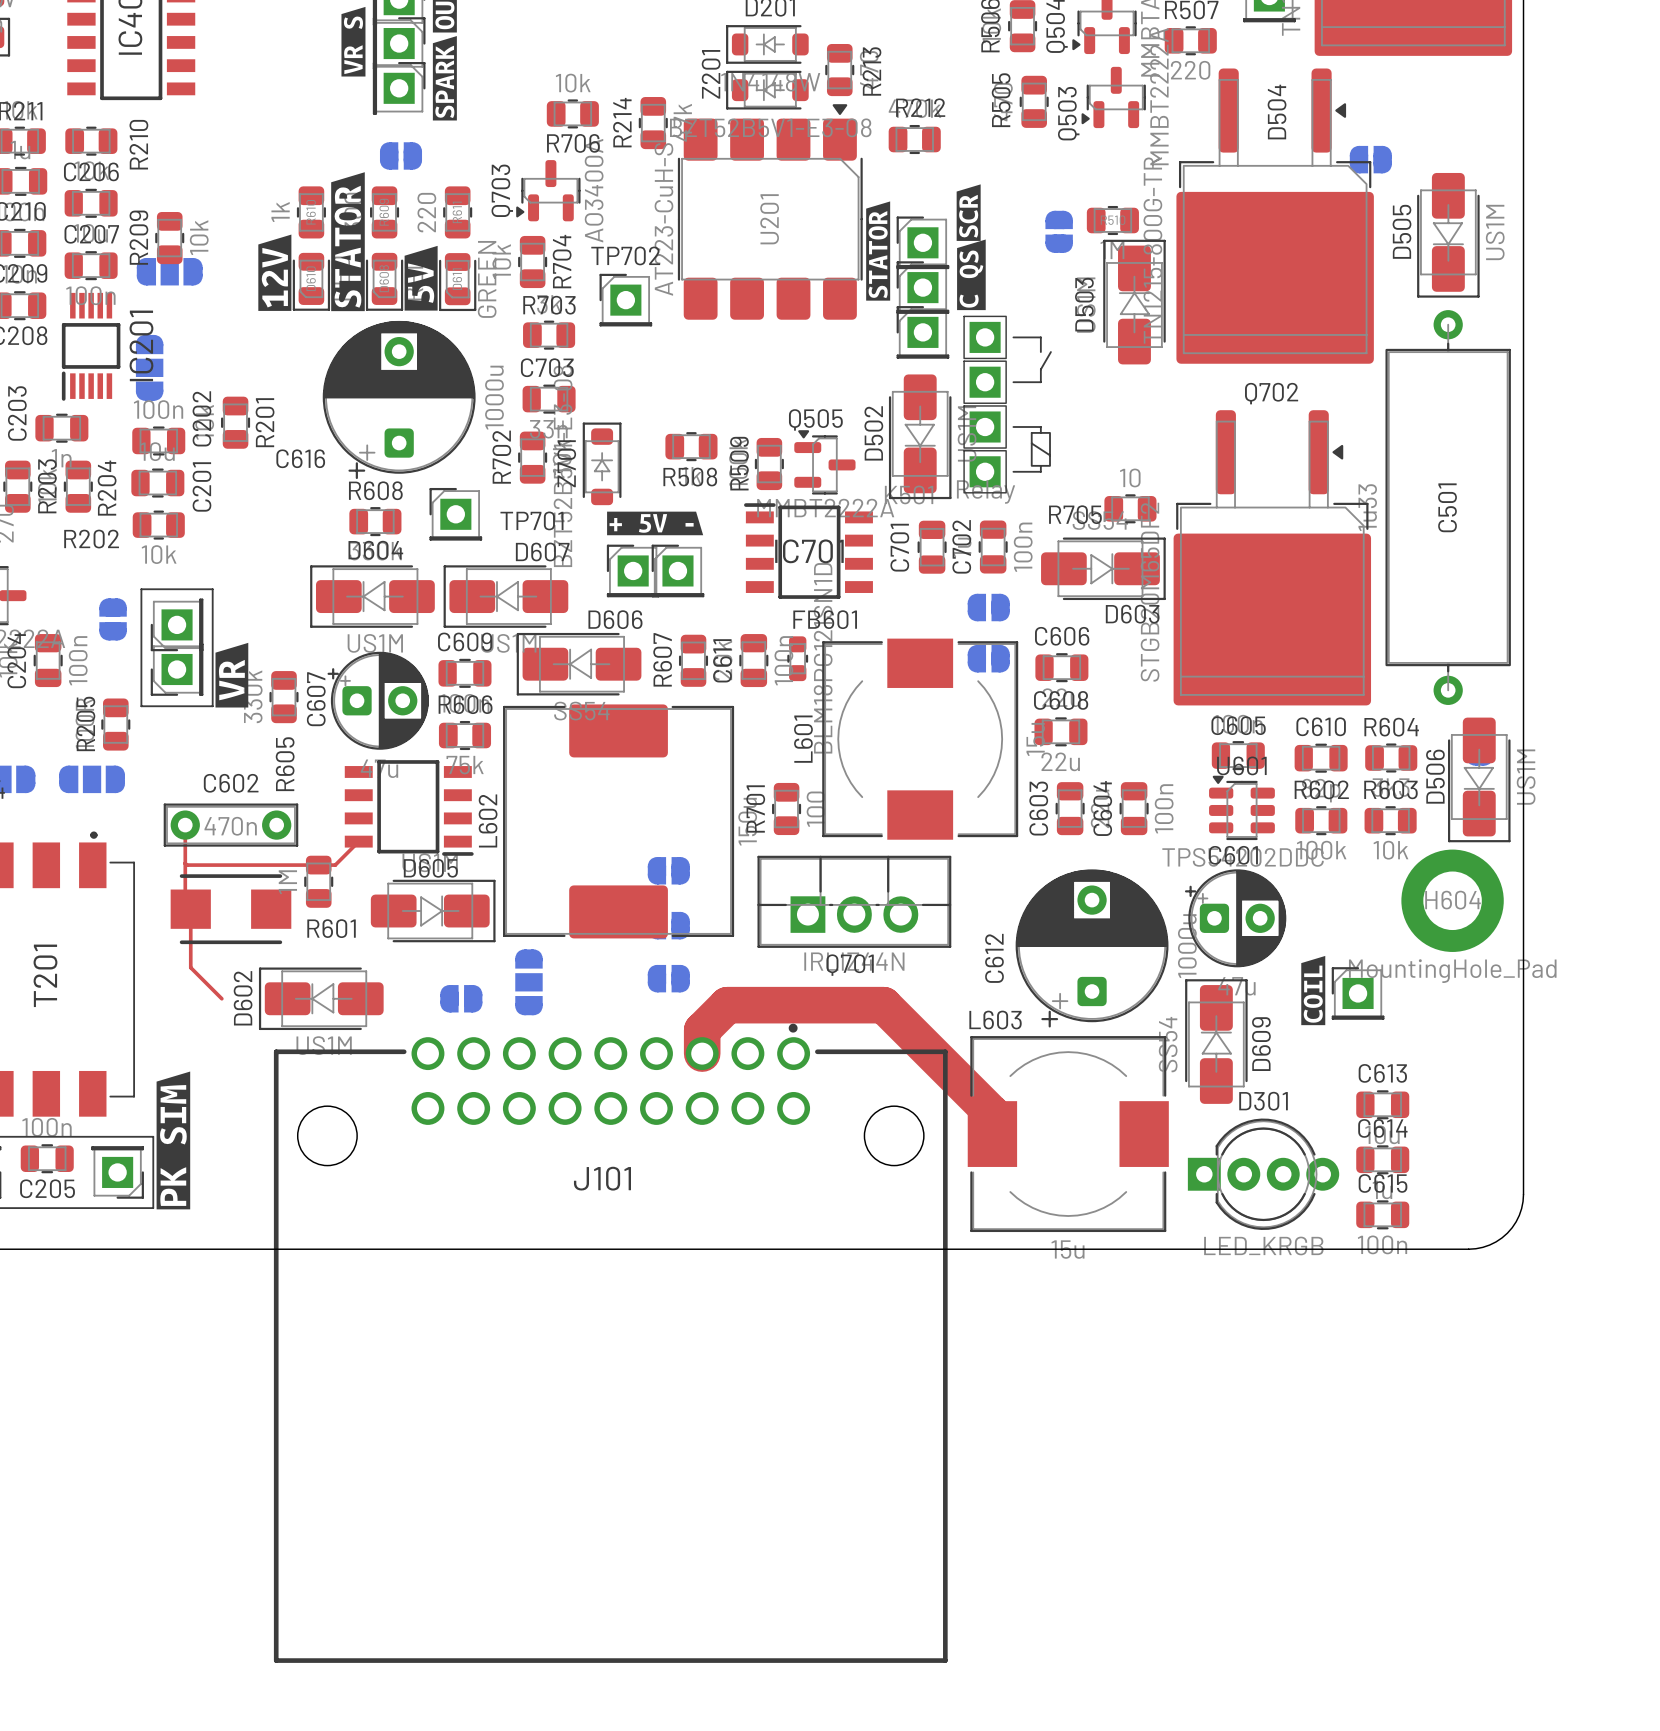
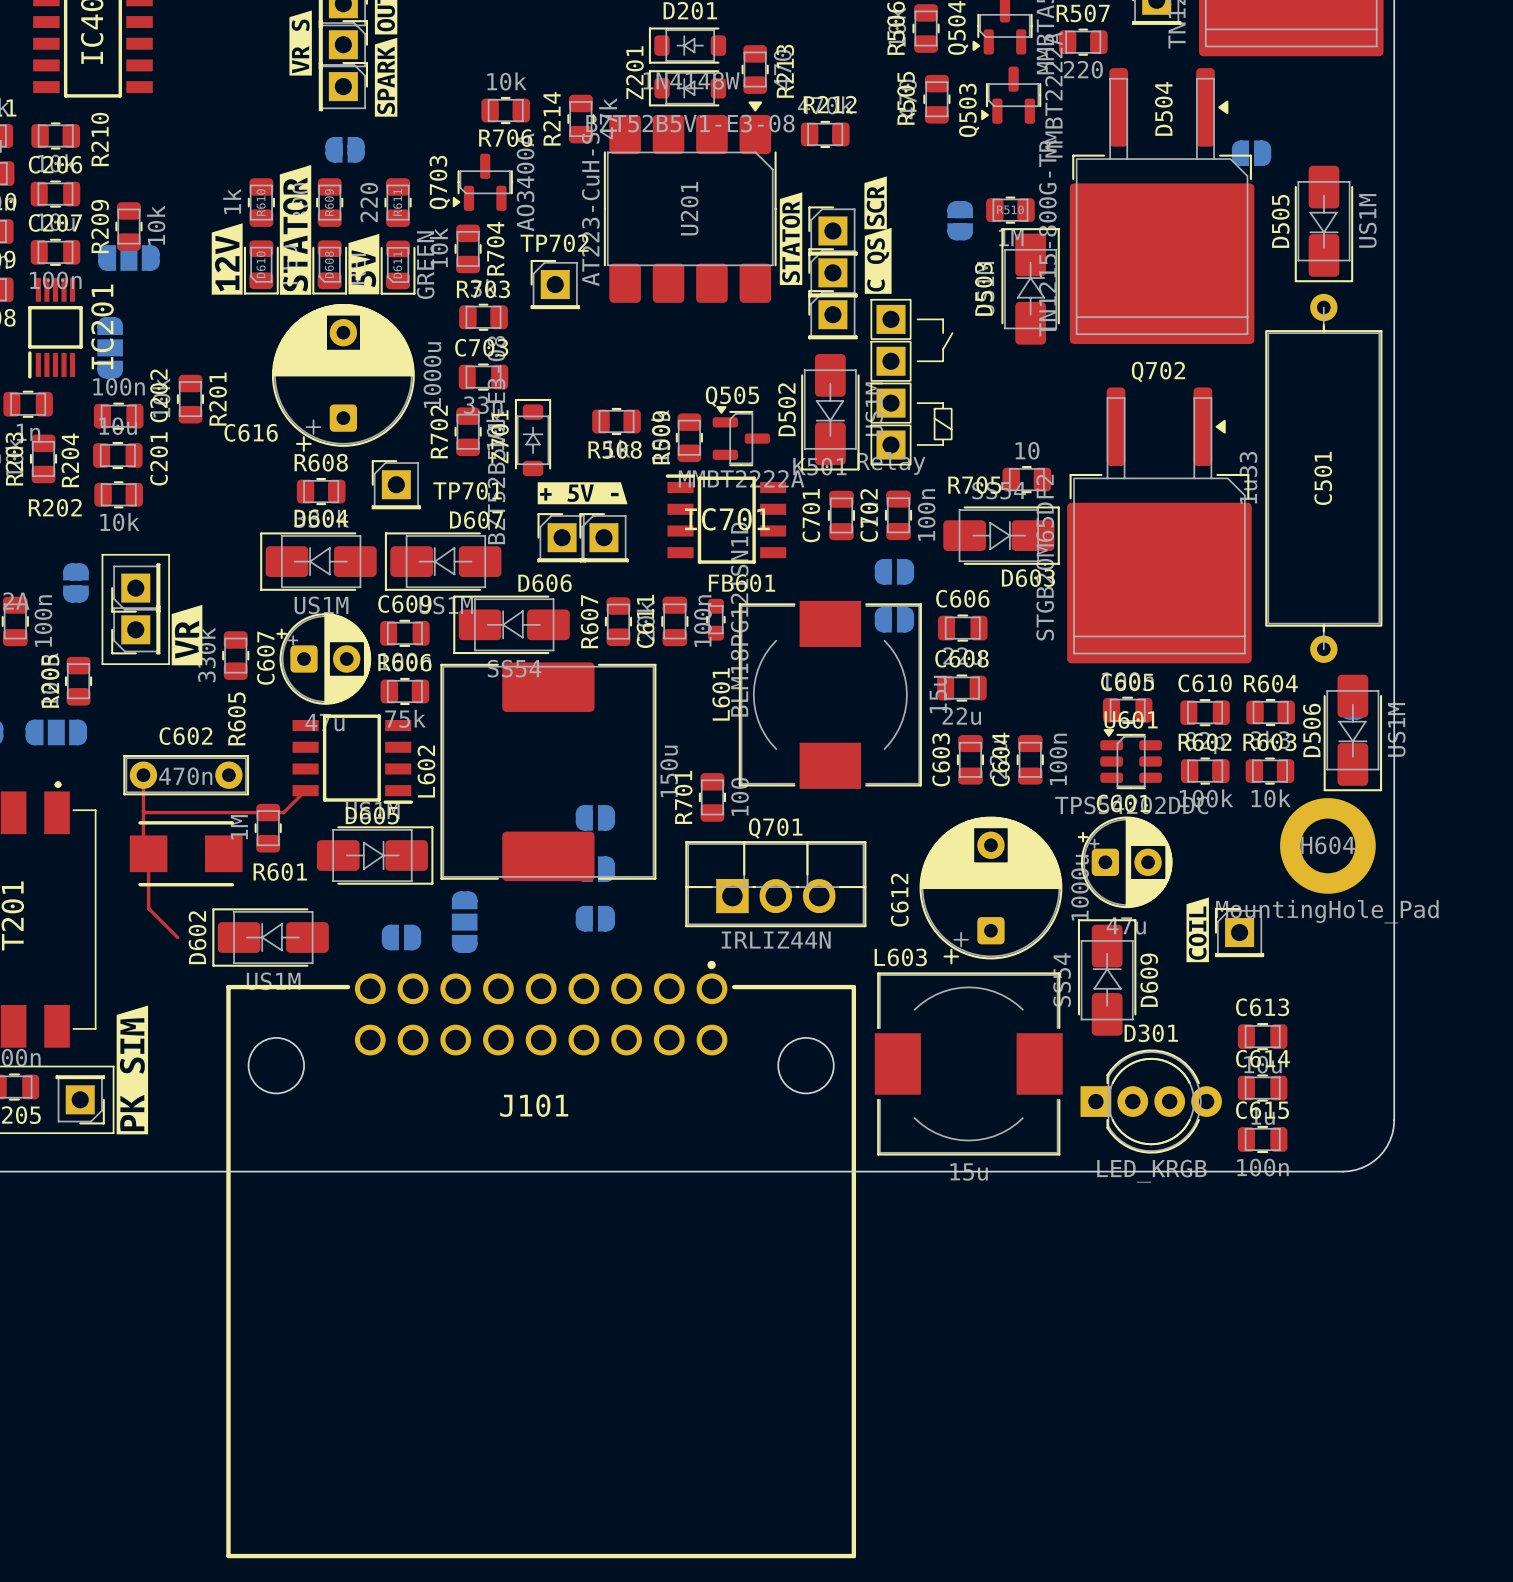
R701 position: (786, 809) -> (712, 797)
Q701 position: (854, 901) -> (775, 884)
Q701 name position: Q701 (850, 965) -> Q701 (775, 828)
top track: (702, 1053) (702, 1030) (727, 1005) (883, 1005) (992, 1113) (992, 1134) -> none

